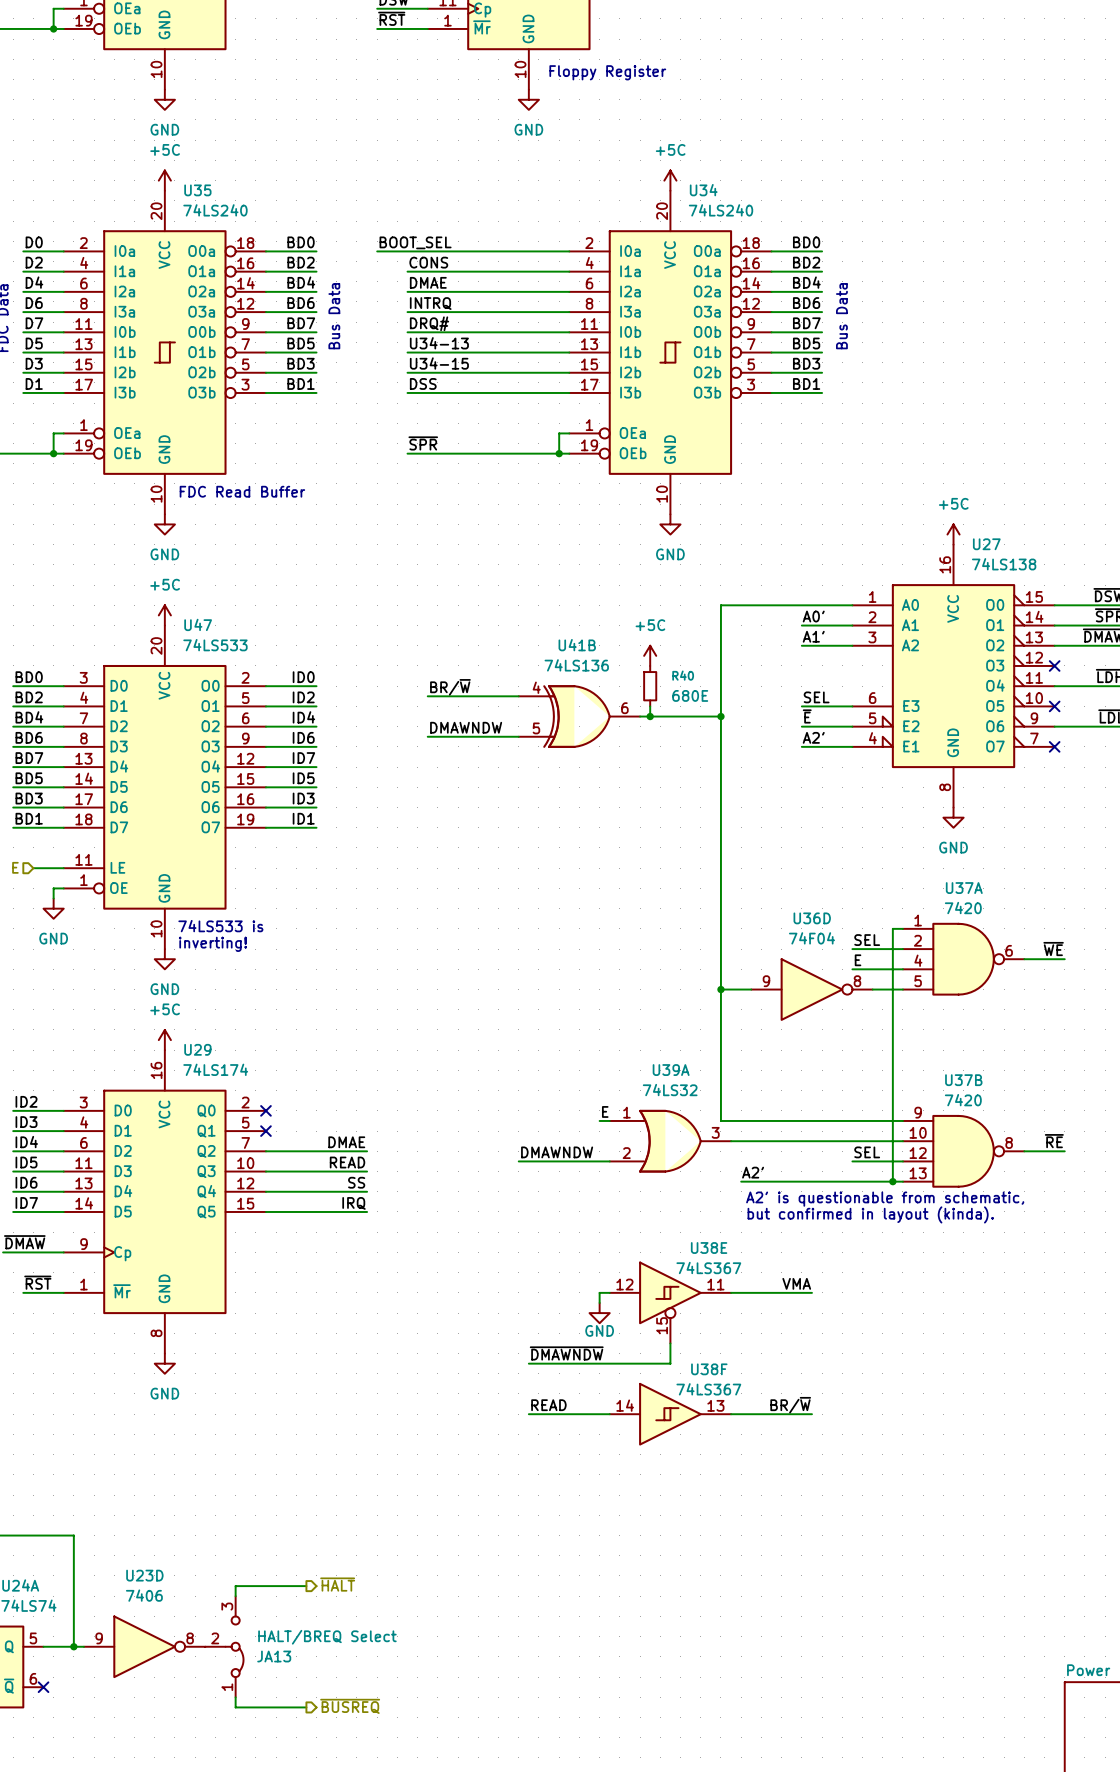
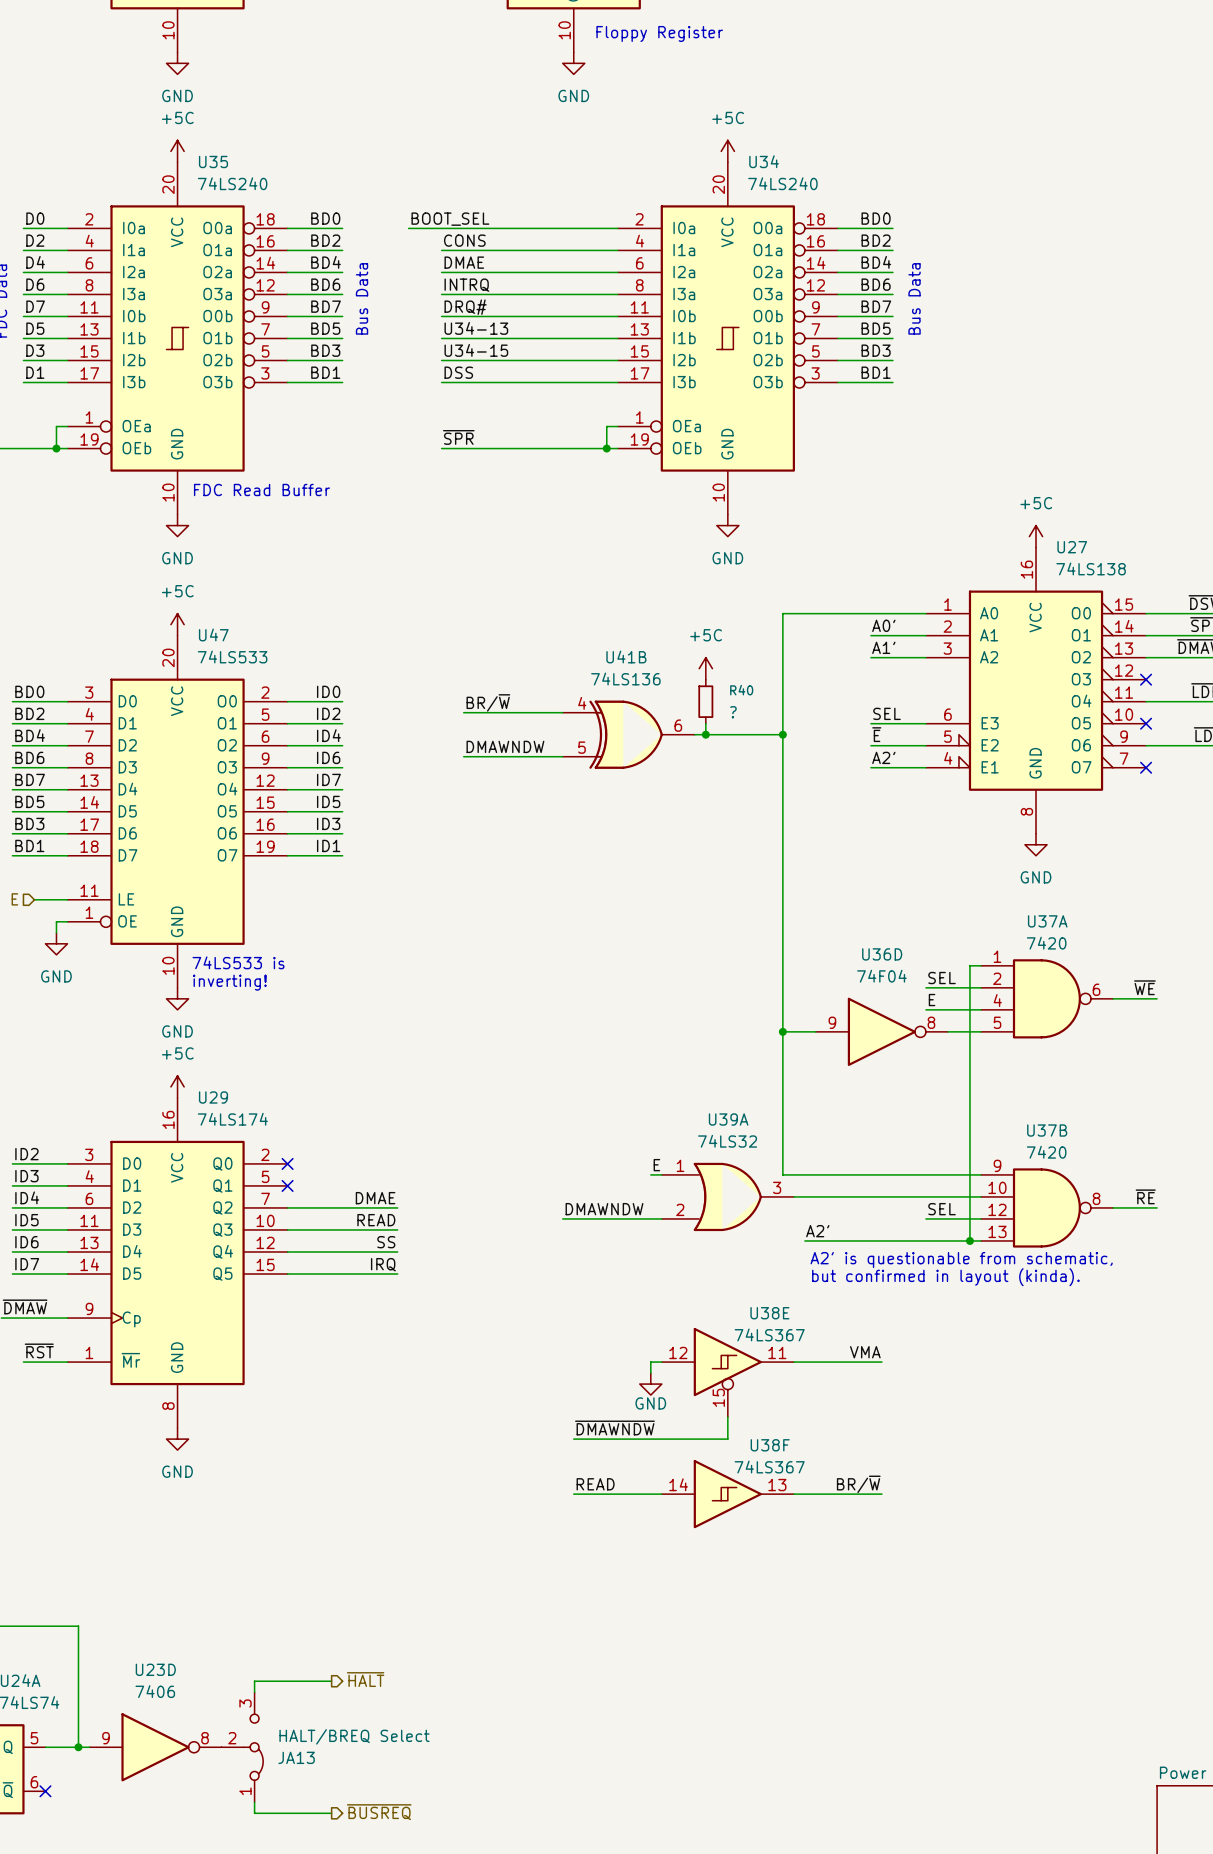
R40 value: 680E (690, 695) -> ? (733, 712)

